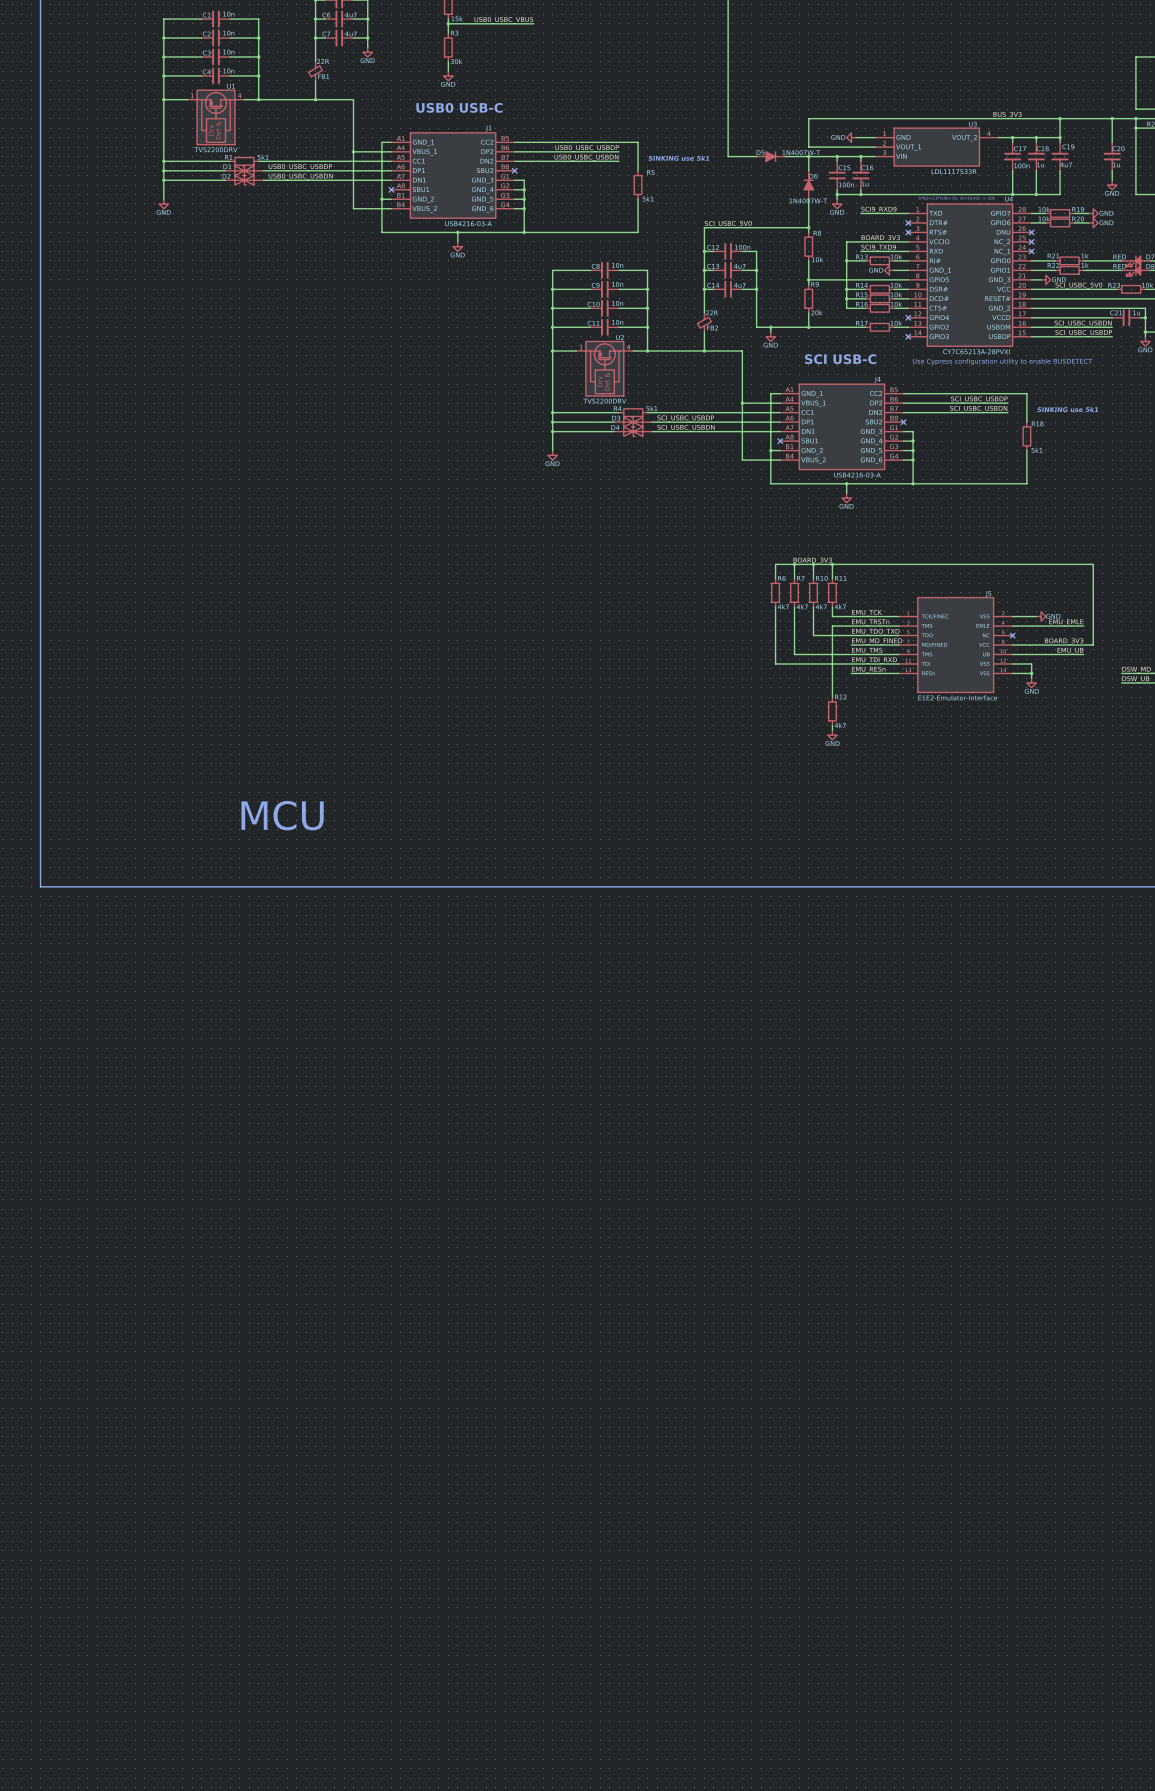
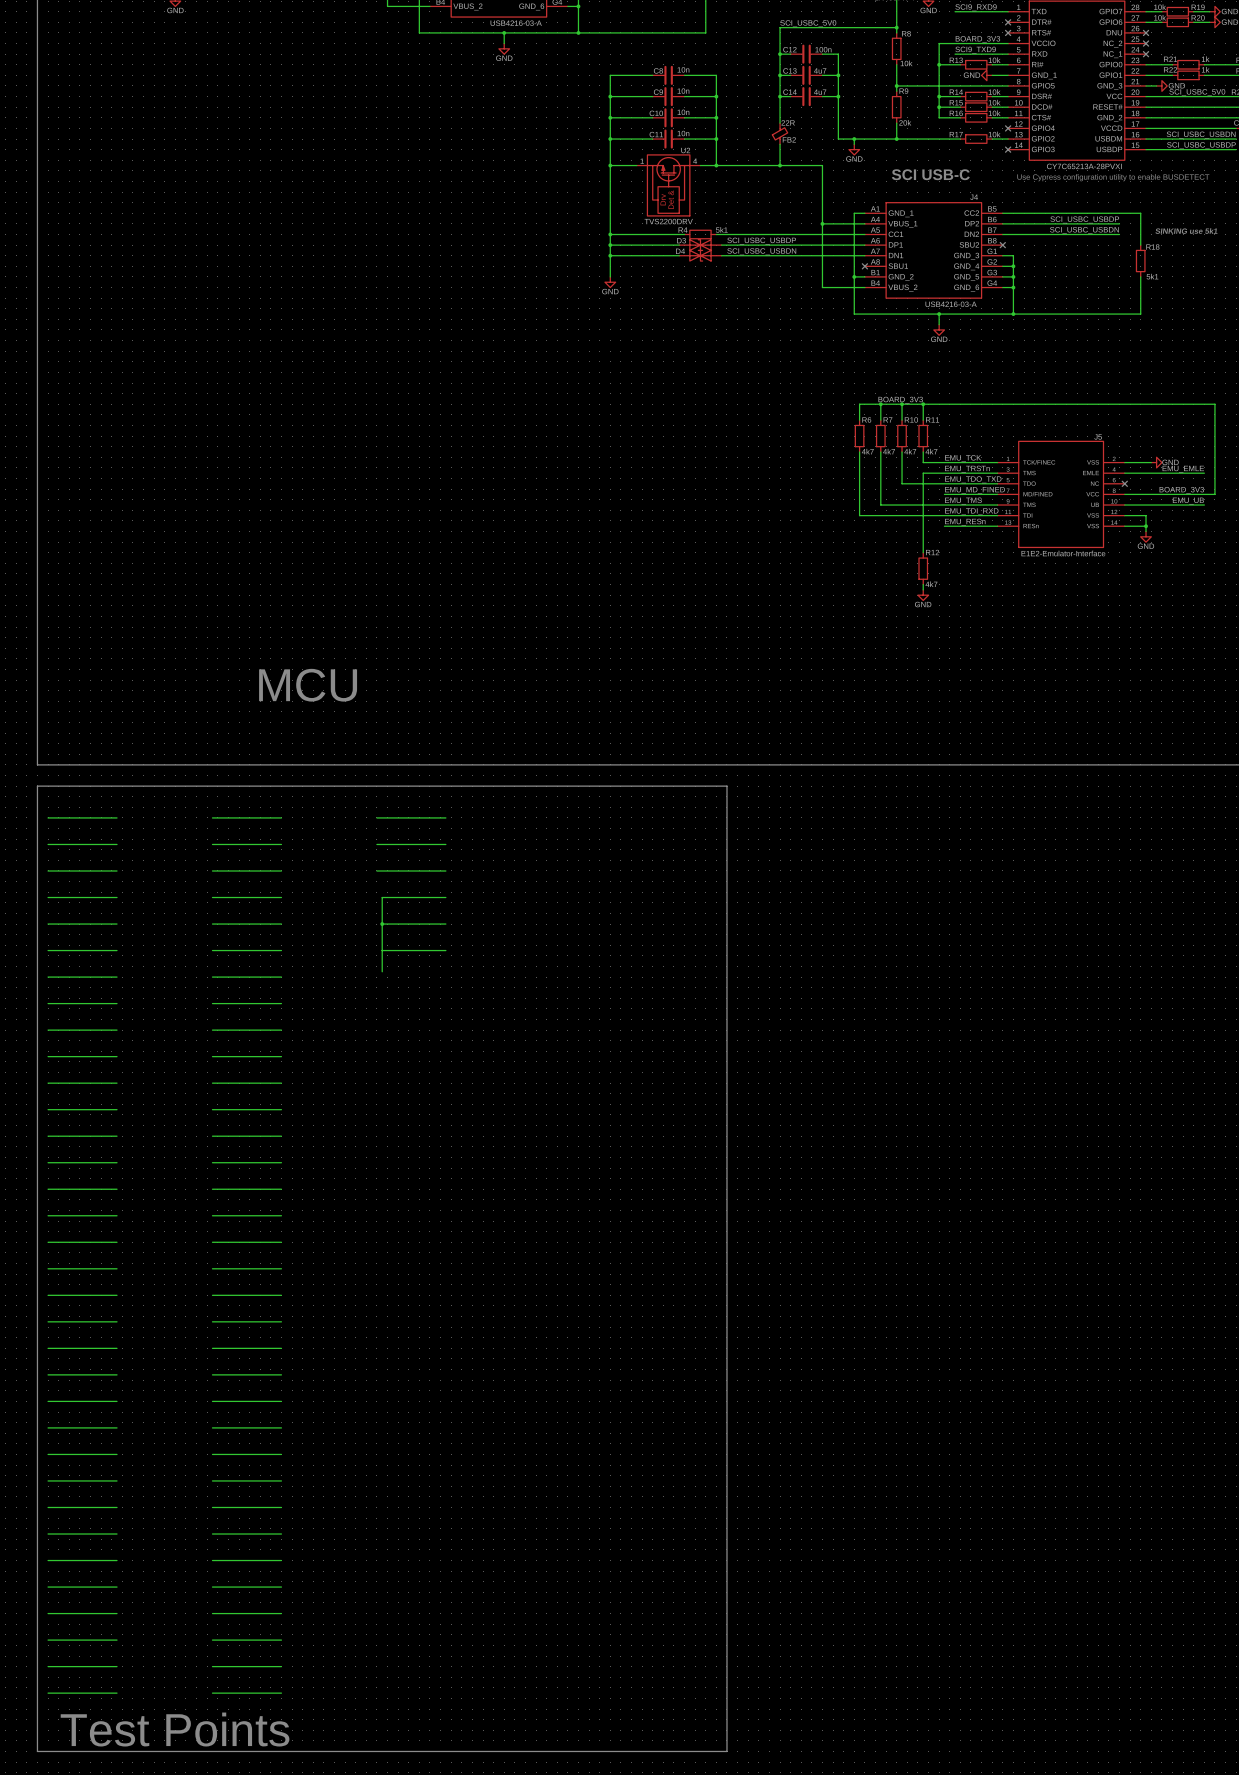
line: none -> (37, 786) (726, 786) (726, 1751) (37, 1751) (37, 786)
wire: none -> (48, 817) (117, 817)
wire: none -> (212, 817) (281, 817)
wire: none -> (376, 817) (445, 817)
wire: none -> (48, 844) (117, 844)
wire: none -> (212, 844) (281, 844)
wire: none -> (376, 844) (445, 844)
wire: none -> (48, 870) (117, 870)
wire: none -> (212, 870) (281, 870)
wire: none -> (376, 870) (445, 870)
wire: none -> (48, 897) (117, 897)
wire: none -> (212, 897) (281, 897)
wire: none -> (445, 897) (382, 897) (382, 971)
wire: none -> (48, 924) (117, 924)
wire: none -> (212, 924) (281, 924)
wire: none -> (382, 924) (445, 924)
junction: none -> (382, 924)
wire: none -> (48, 950) (117, 950)
wire: none -> (212, 950) (281, 950)
wire: none -> (382, 950) (445, 950)
wire: none -> (48, 977) (117, 977)
wire: none -> (212, 977) (281, 977)
wire: none -> (48, 1003) (117, 1003)
wire: none -> (212, 1003) (281, 1003)
wire: none -> (48, 1030) (117, 1030)
wire: none -> (212, 1030) (281, 1030)
wire: none -> (48, 1056) (117, 1056)
wire: none -> (212, 1056) (281, 1056)
wire: none -> (48, 1083) (117, 1083)
wire: none -> (212, 1083) (281, 1083)
wire: none -> (48, 1109) (117, 1109)
wire: none -> (212, 1109) (281, 1109)
wire: none -> (48, 1136) (117, 1136)
wire: none -> (212, 1136) (281, 1136)
wire: none -> (48, 1162) (117, 1162)
wire: none -> (212, 1162) (281, 1162)
wire: none -> (48, 1189) (117, 1189)
wire: none -> (212, 1189) (281, 1189)
wire: none -> (48, 1215) (117, 1215)
wire: none -> (212, 1215) (281, 1215)
wire: none -> (48, 1242) (117, 1242)
wire: none -> (212, 1242) (281, 1242)
wire: none -> (48, 1268) (117, 1268)
wire: none -> (212, 1268) (281, 1268)
wire: none -> (48, 1295) (117, 1295)
wire: none -> (212, 1295) (281, 1295)
wire: none -> (48, 1321) (117, 1321)
wire: none -> (212, 1321) (281, 1321)
wire: none -> (48, 1348) (117, 1348)
wire: none -> (212, 1348) (281, 1348)
wire: none -> (48, 1374) (117, 1374)
wire: none -> (212, 1374) (281, 1374)
wire: none -> (48, 1401) (117, 1401)
wire: none -> (212, 1401) (281, 1401)
wire: none -> (48, 1427) (117, 1427)
wire: none -> (212, 1427) (281, 1427)
wire: none -> (48, 1454) (117, 1454)
wire: none -> (212, 1454) (281, 1454)
wire: none -> (48, 1480) (117, 1480)
wire: none -> (212, 1480) (281, 1480)
wire: none -> (48, 1507) (117, 1507)
wire: none -> (212, 1507) (281, 1507)
wire: none -> (48, 1534) (117, 1534)
wire: none -> (212, 1534) (281, 1534)
wire: none -> (48, 1560) (117, 1560)
wire: none -> (212, 1560) (281, 1560)
wire: none -> (48, 1587) (117, 1587)
wire: none -> (212, 1587) (281, 1587)
wire: none -> (48, 1613) (117, 1613)
wire: none -> (212, 1613) (281, 1613)
wire: none -> (48, 1640) (117, 1640)
wire: none -> (212, 1640) (281, 1640)
wire: none -> (48, 1666) (117, 1666)
wire: none -> (212, 1666) (281, 1666)
wire: none -> (48, 1693) (117, 1693)
wire: none -> (212, 1693) (281, 1693)
text: none -> Test Points (175, 1729)

